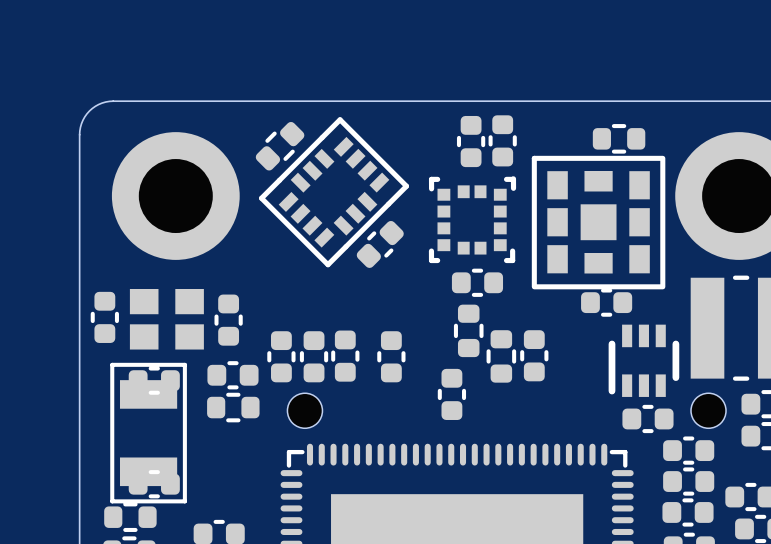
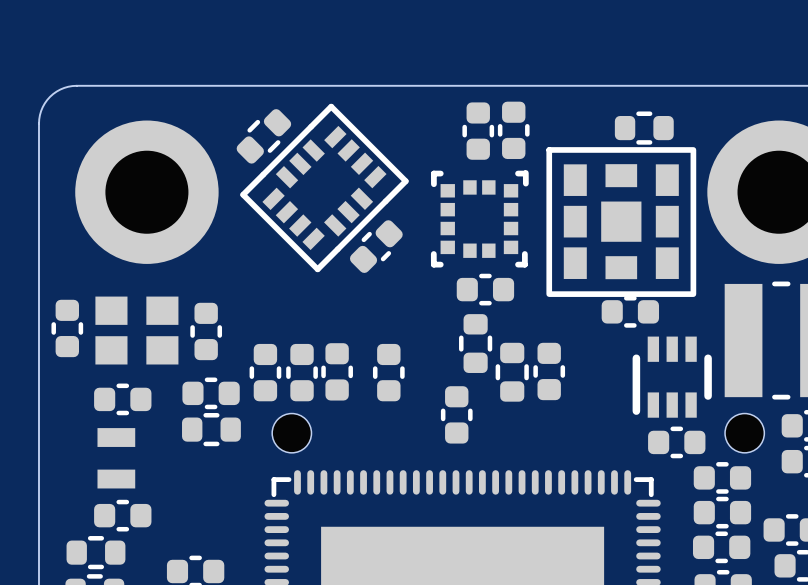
part footprint: [110, 362, 187, 504] -> [97, 428, 136, 489]

